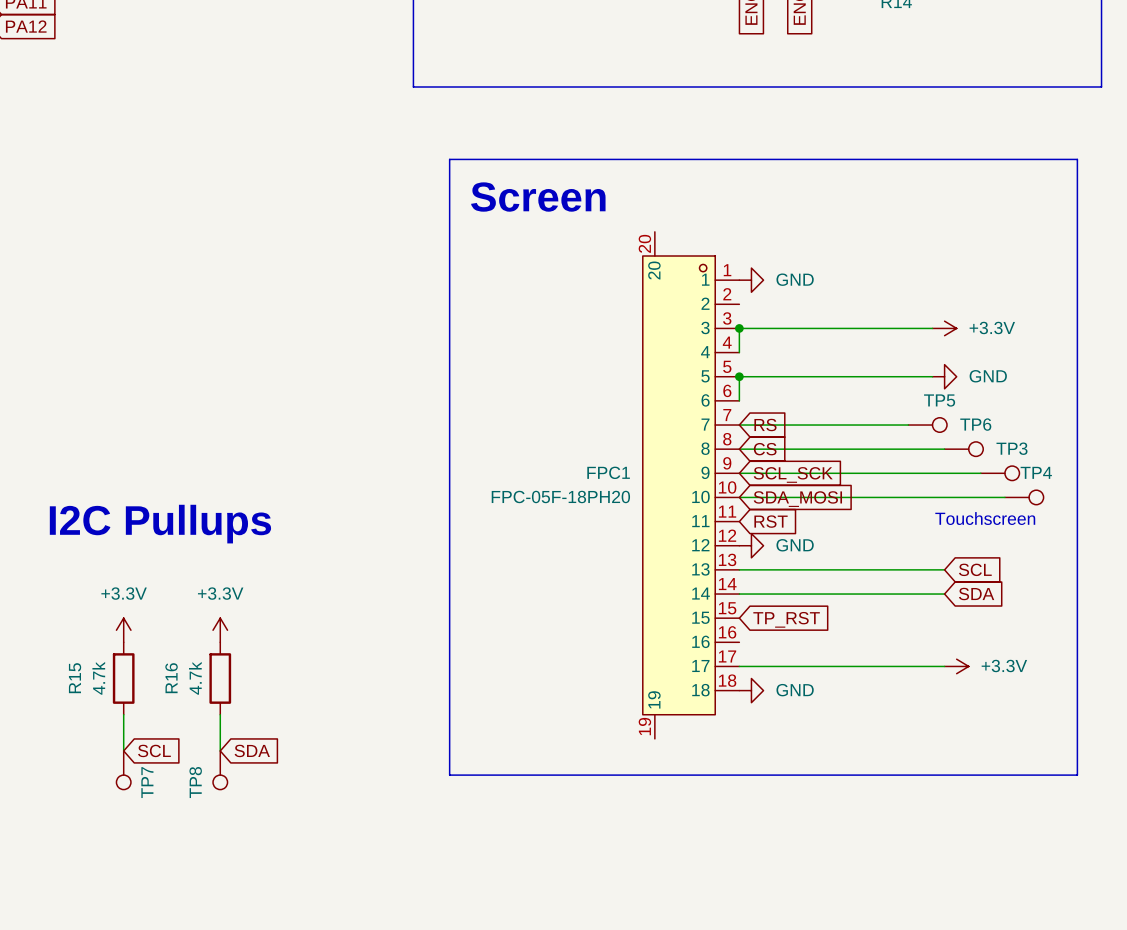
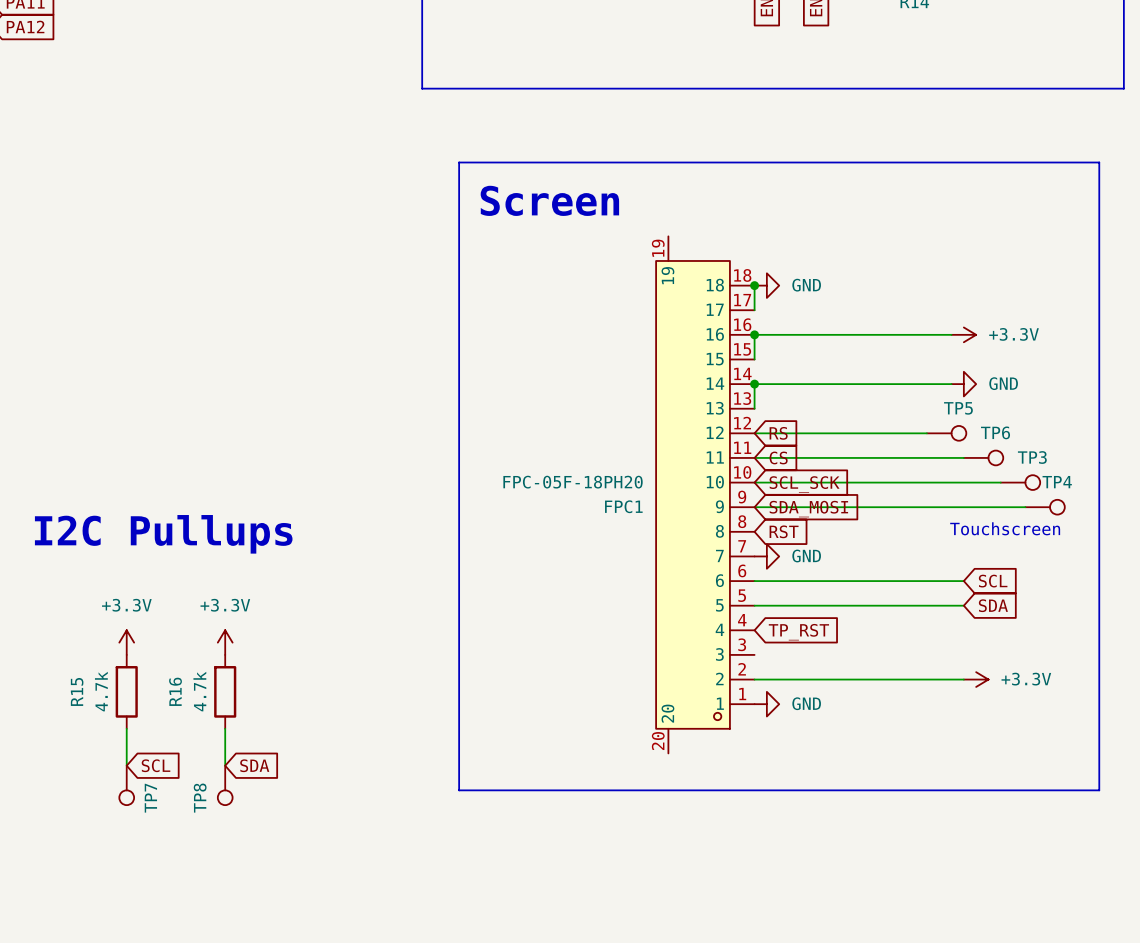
wire: none -> (754, 285) (754, 310)
junction: none -> (754, 285)
FPC1 flip: as is (679, 485) -> up-down (693, 494)

